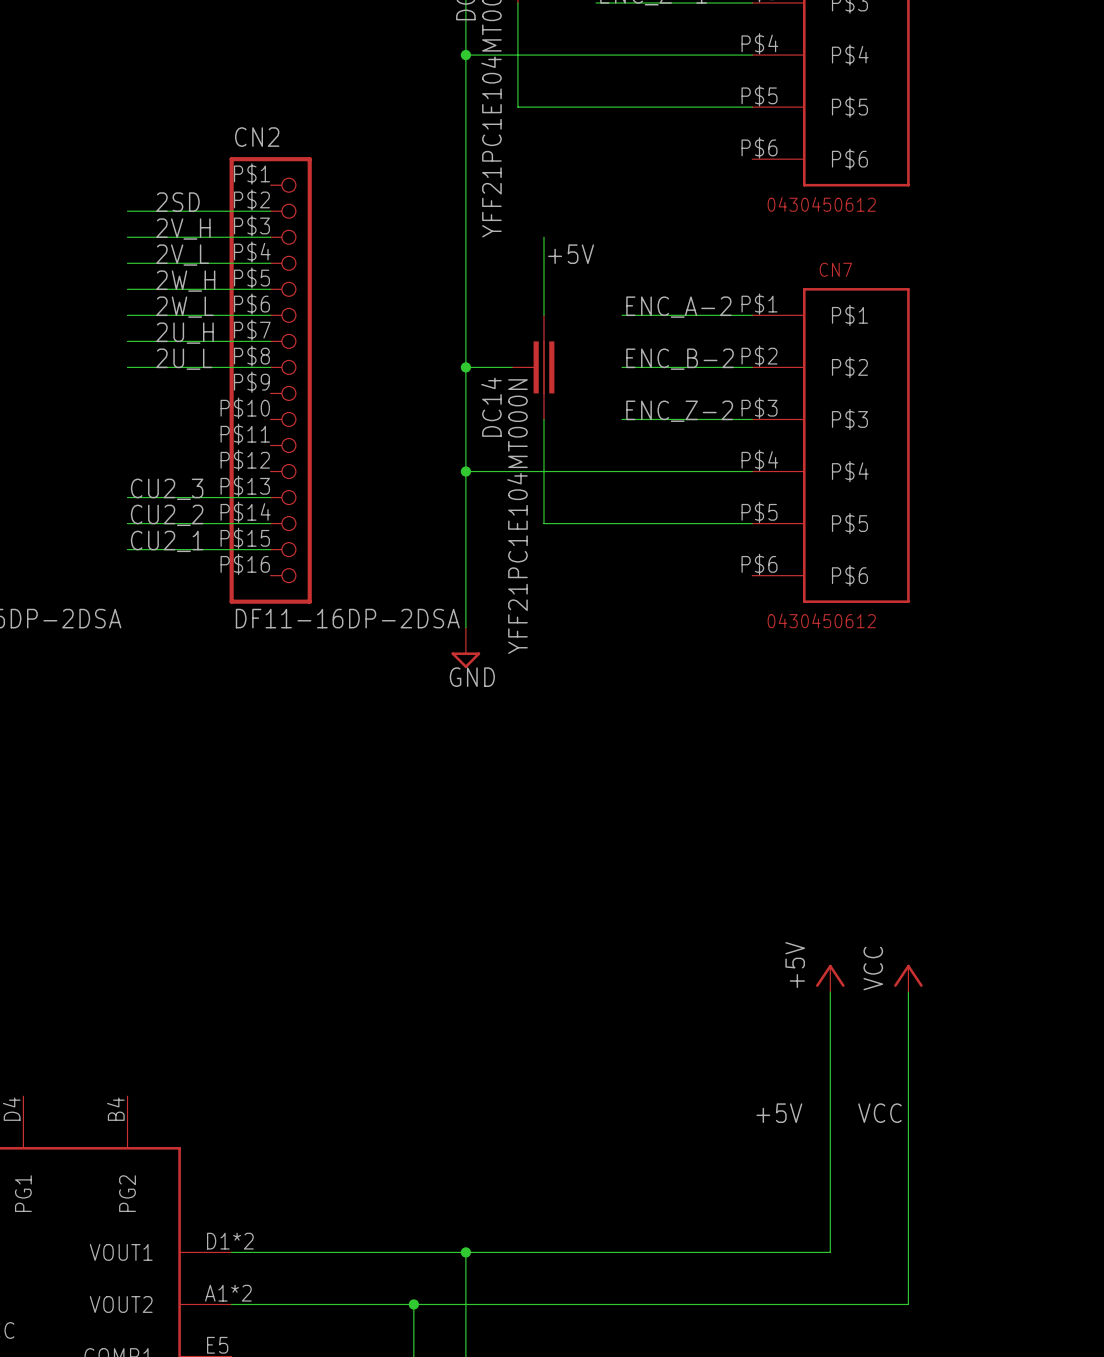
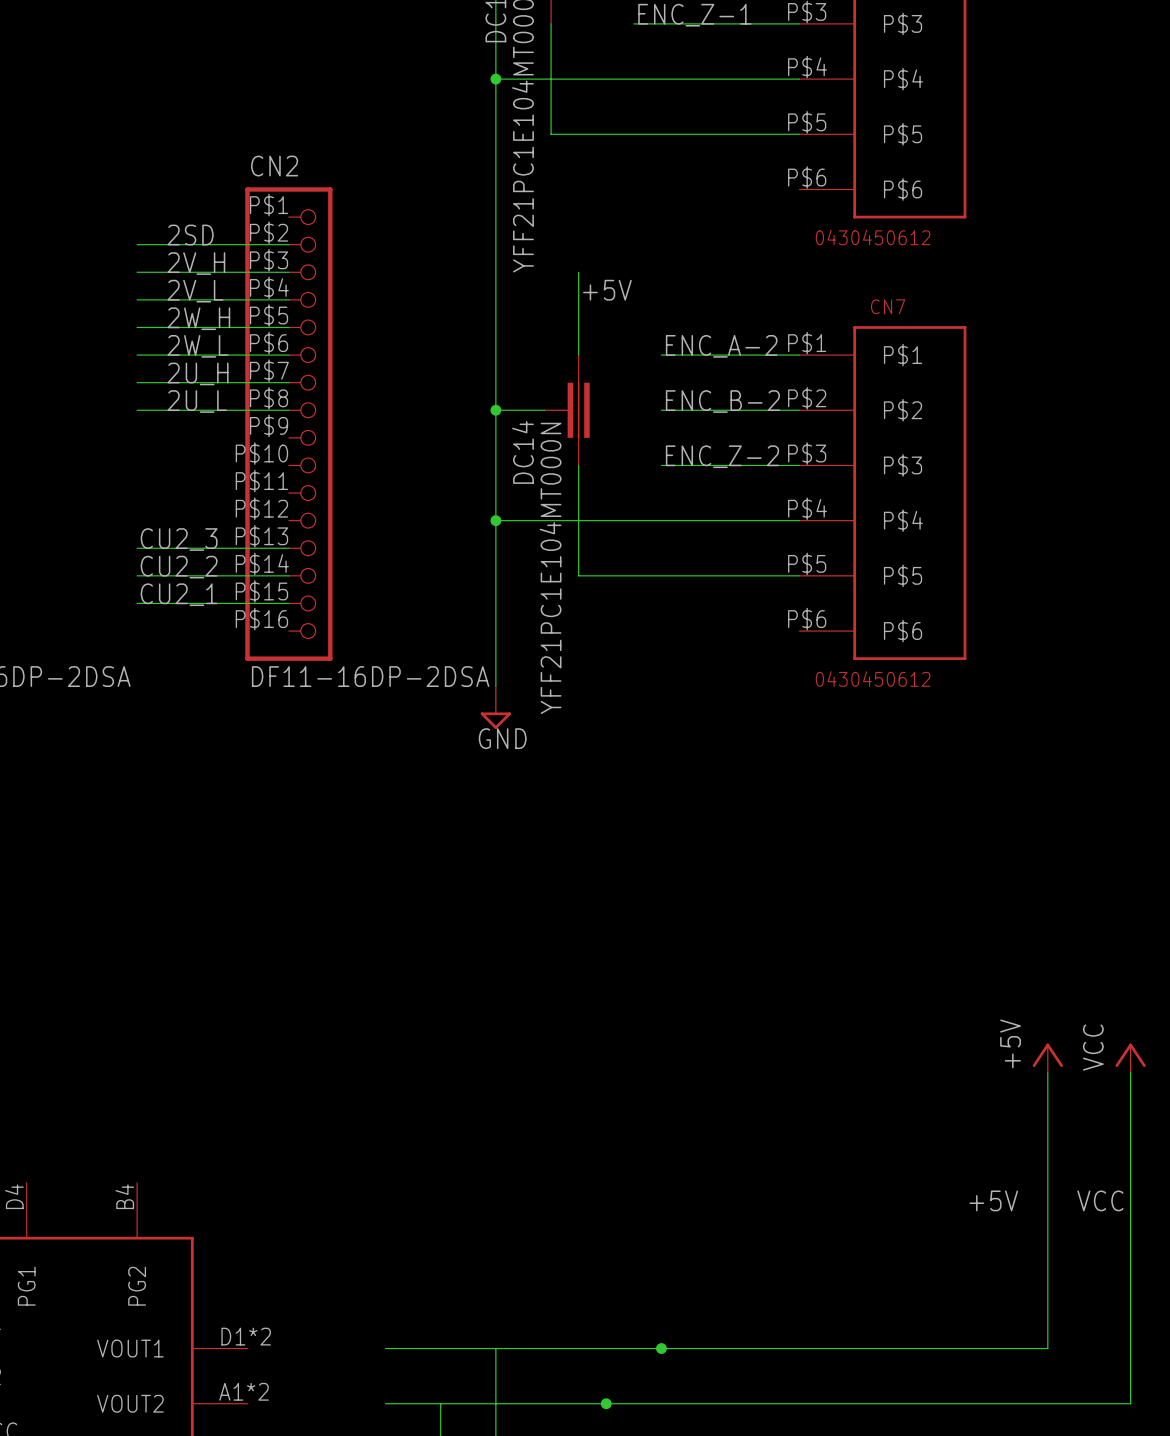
power symbol position: +5V (830, 978) -> +5V (1047, 1058)
power symbol position: VCC (908, 978) -> VCC (1130, 1058)
wire: (830, 992) (830, 1252) -> (1047, 1072) (1047, 1348) (882, 1348)
wire: (908, 992) (908, 1304) -> (1130, 1072) (1130, 1403) (965, 1403)
label position: +5V (779, 1113) -> +5V (993, 1200)
label position: VCC (879, 1113) -> VCC (1100, 1200)
wire: (231, 1252) (361, 1252) -> none
junction: (465, 1252) -> none
junction: none -> (661, 1348)
wire: (231, 1304) (361, 1304) -> none
junction: (413, 1304) -> none
junction: none -> (606, 1403)

